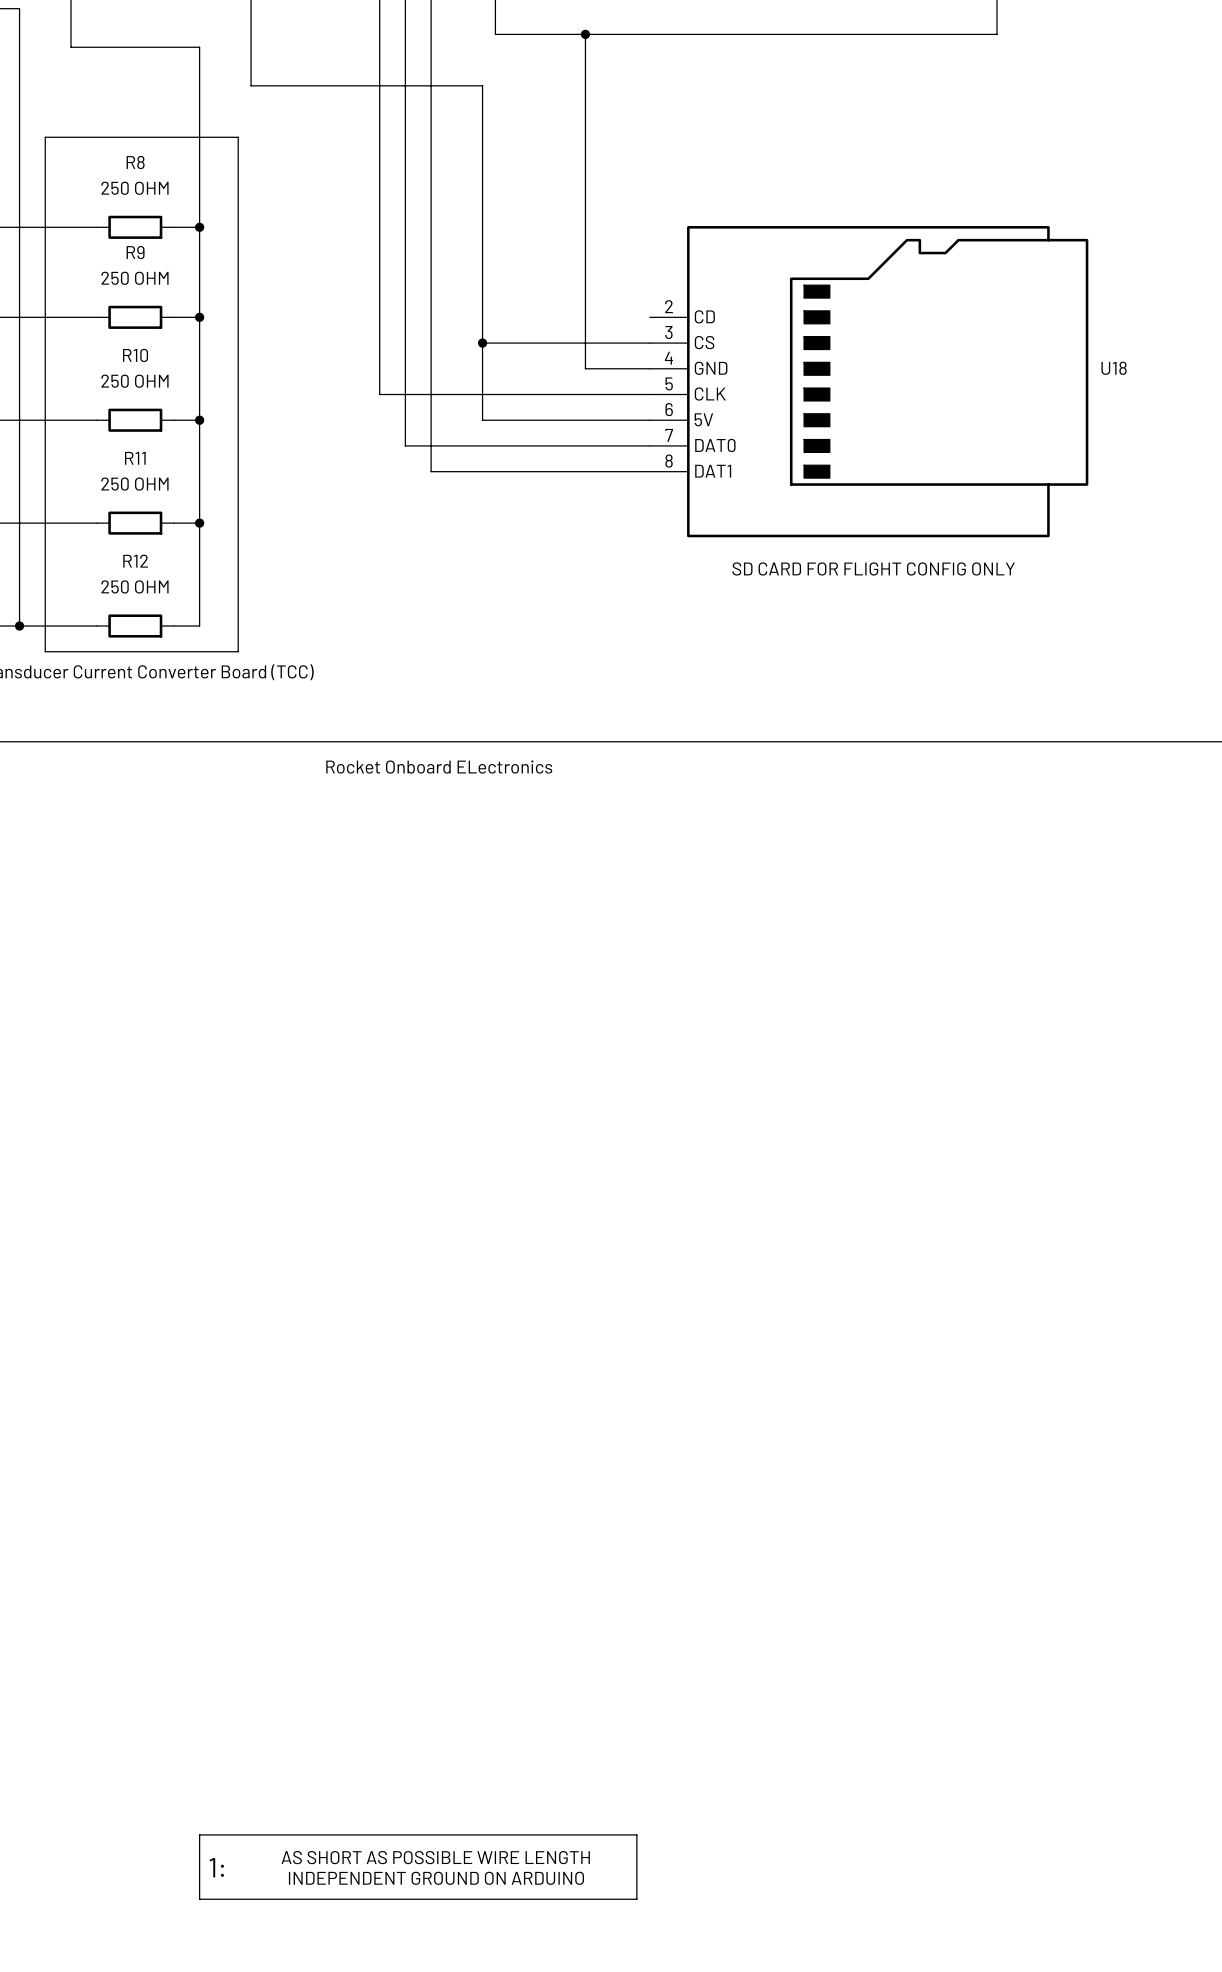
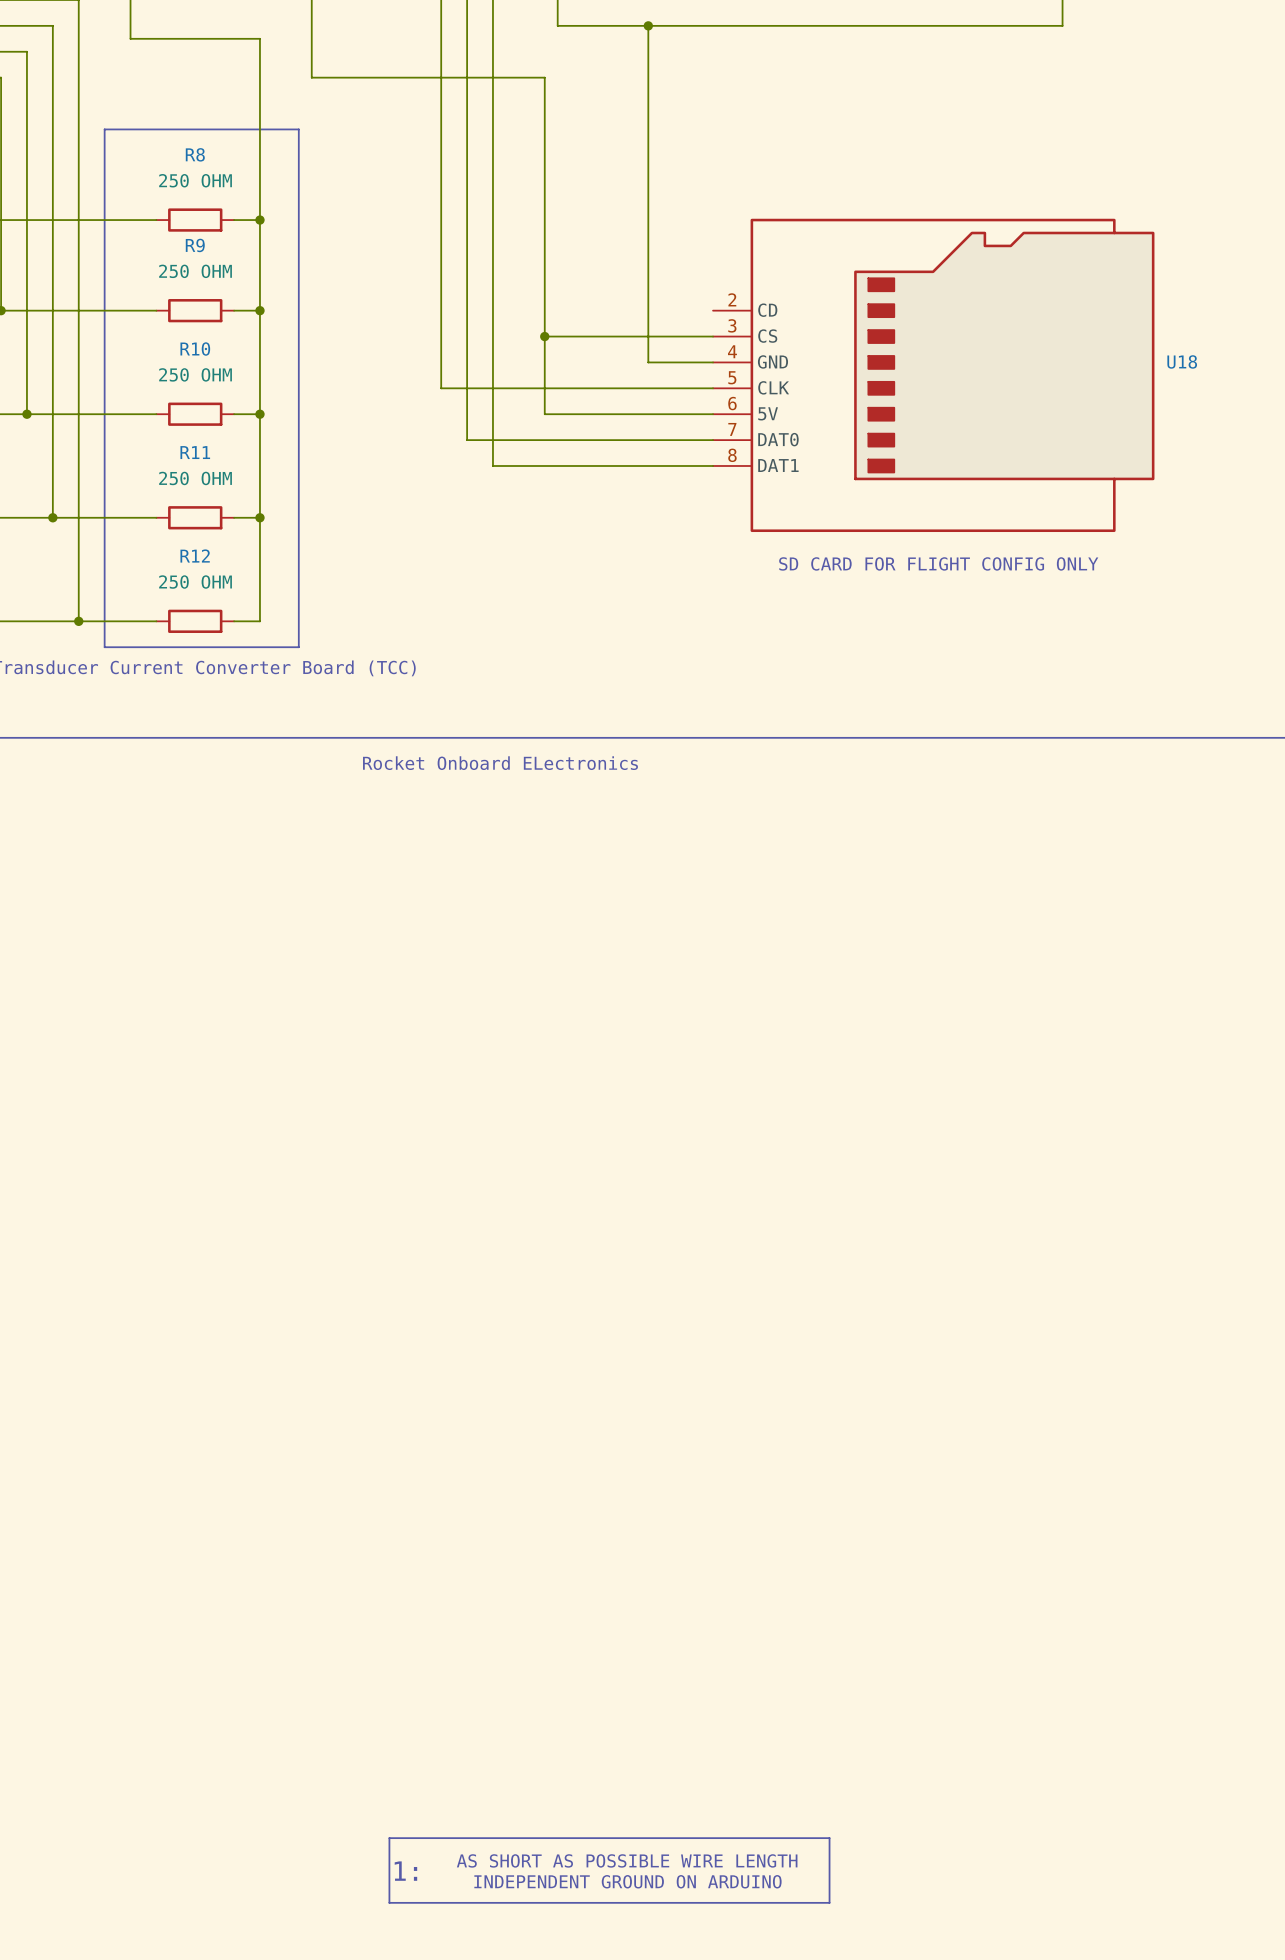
line: (328, 1834) (199, 1834) (199, 1899) (328, 1899) -> (389, 1838) (389, 1902)
line: (636, 1834) (636, 1899) -> (700, 1838) (829, 1838) (829, 1902) (700, 1902)
text position: AS SHORT AS POSSIBLE WIRE LENGTH (435, 1857) -> AS SHORT AS POSSIBLE WIRE LENGTH (627, 1860)
text position: 1: (216, 1867) -> 1: (405, 1871)
text position: INDEPENDENT GROUND ON ARDUINO (436, 1878) -> INDEPENDENT GROUND ON ARDUINO (627, 1881)

